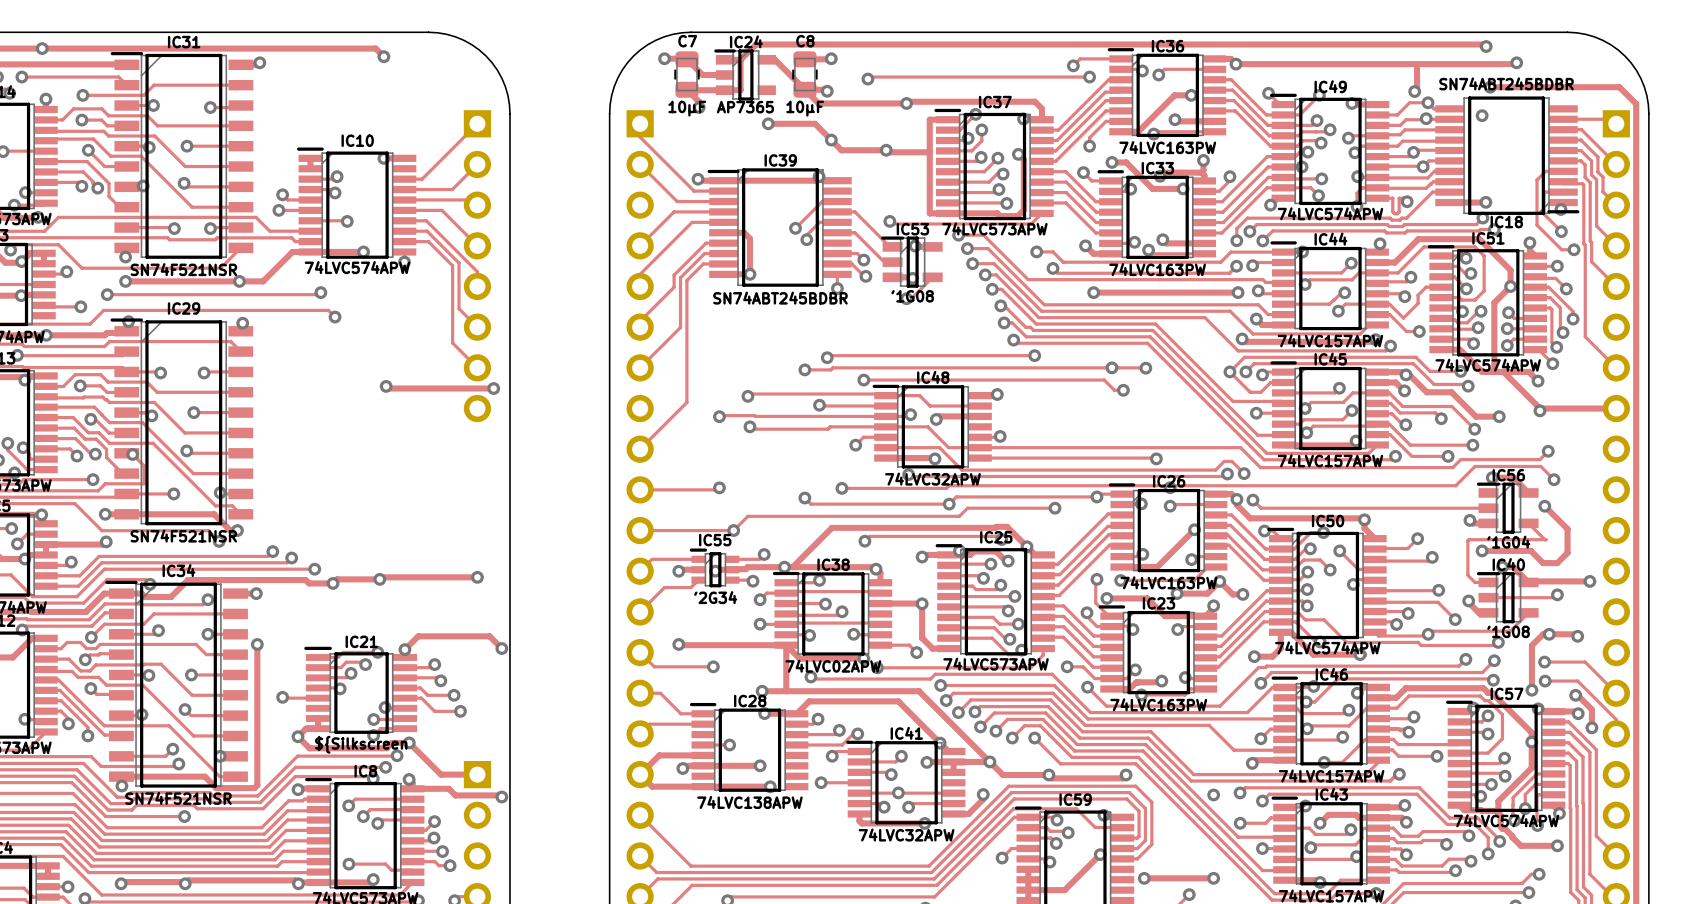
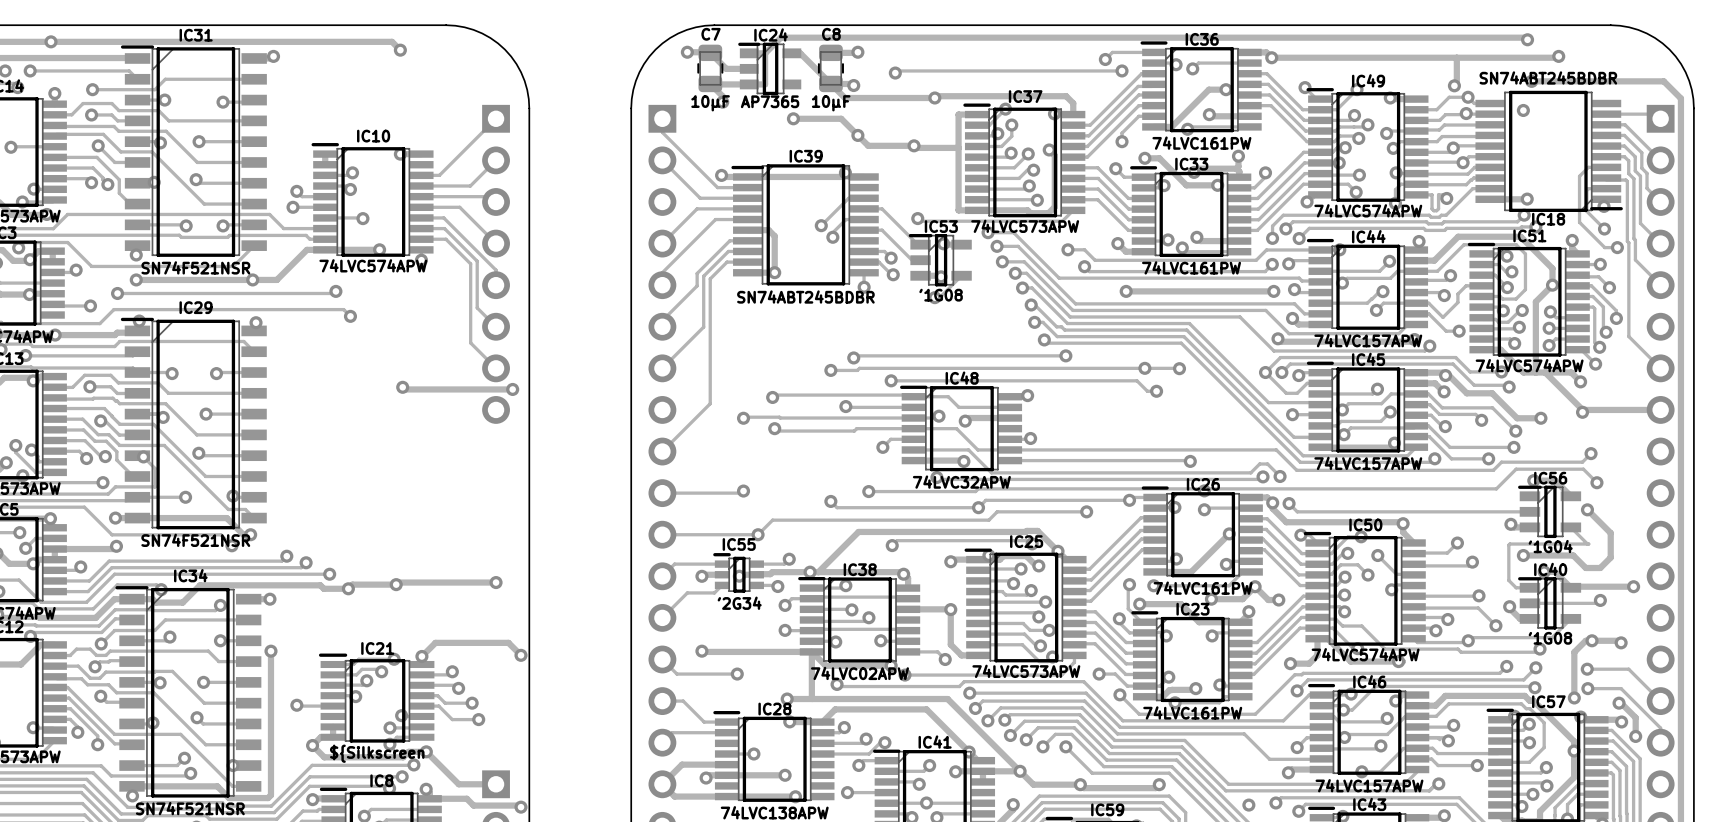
IC36 text: 74LVC163PW (1167, 147) -> 74LVC161PW (1201, 143)
IC33 text: 74LVC163PW (1157, 269) -> 74LVC161PW (1191, 267)
IC26 text: 74LVC163PW (1168, 582) -> 74LVC161PW (1203, 588)
IC23 text: 74LVC163PW (1158, 704) -> 74LVC161PW (1192, 712)

